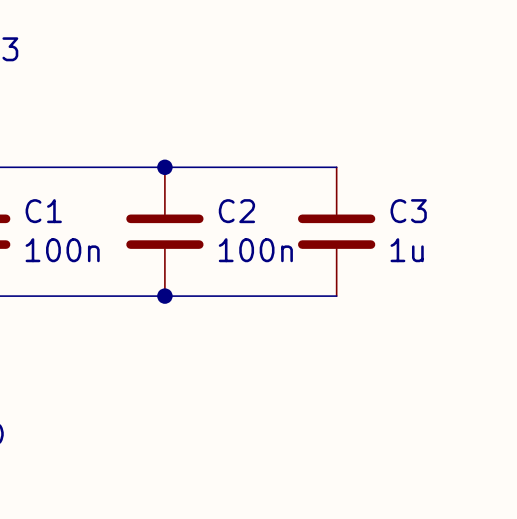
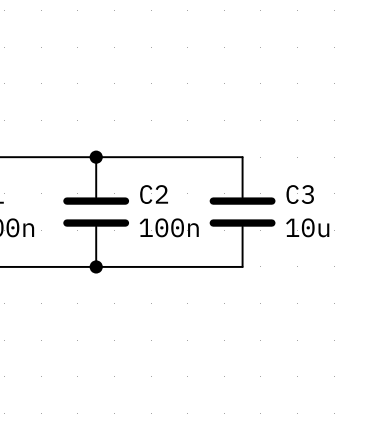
C3 value: 1u (407, 250) -> 10u (307, 227)

